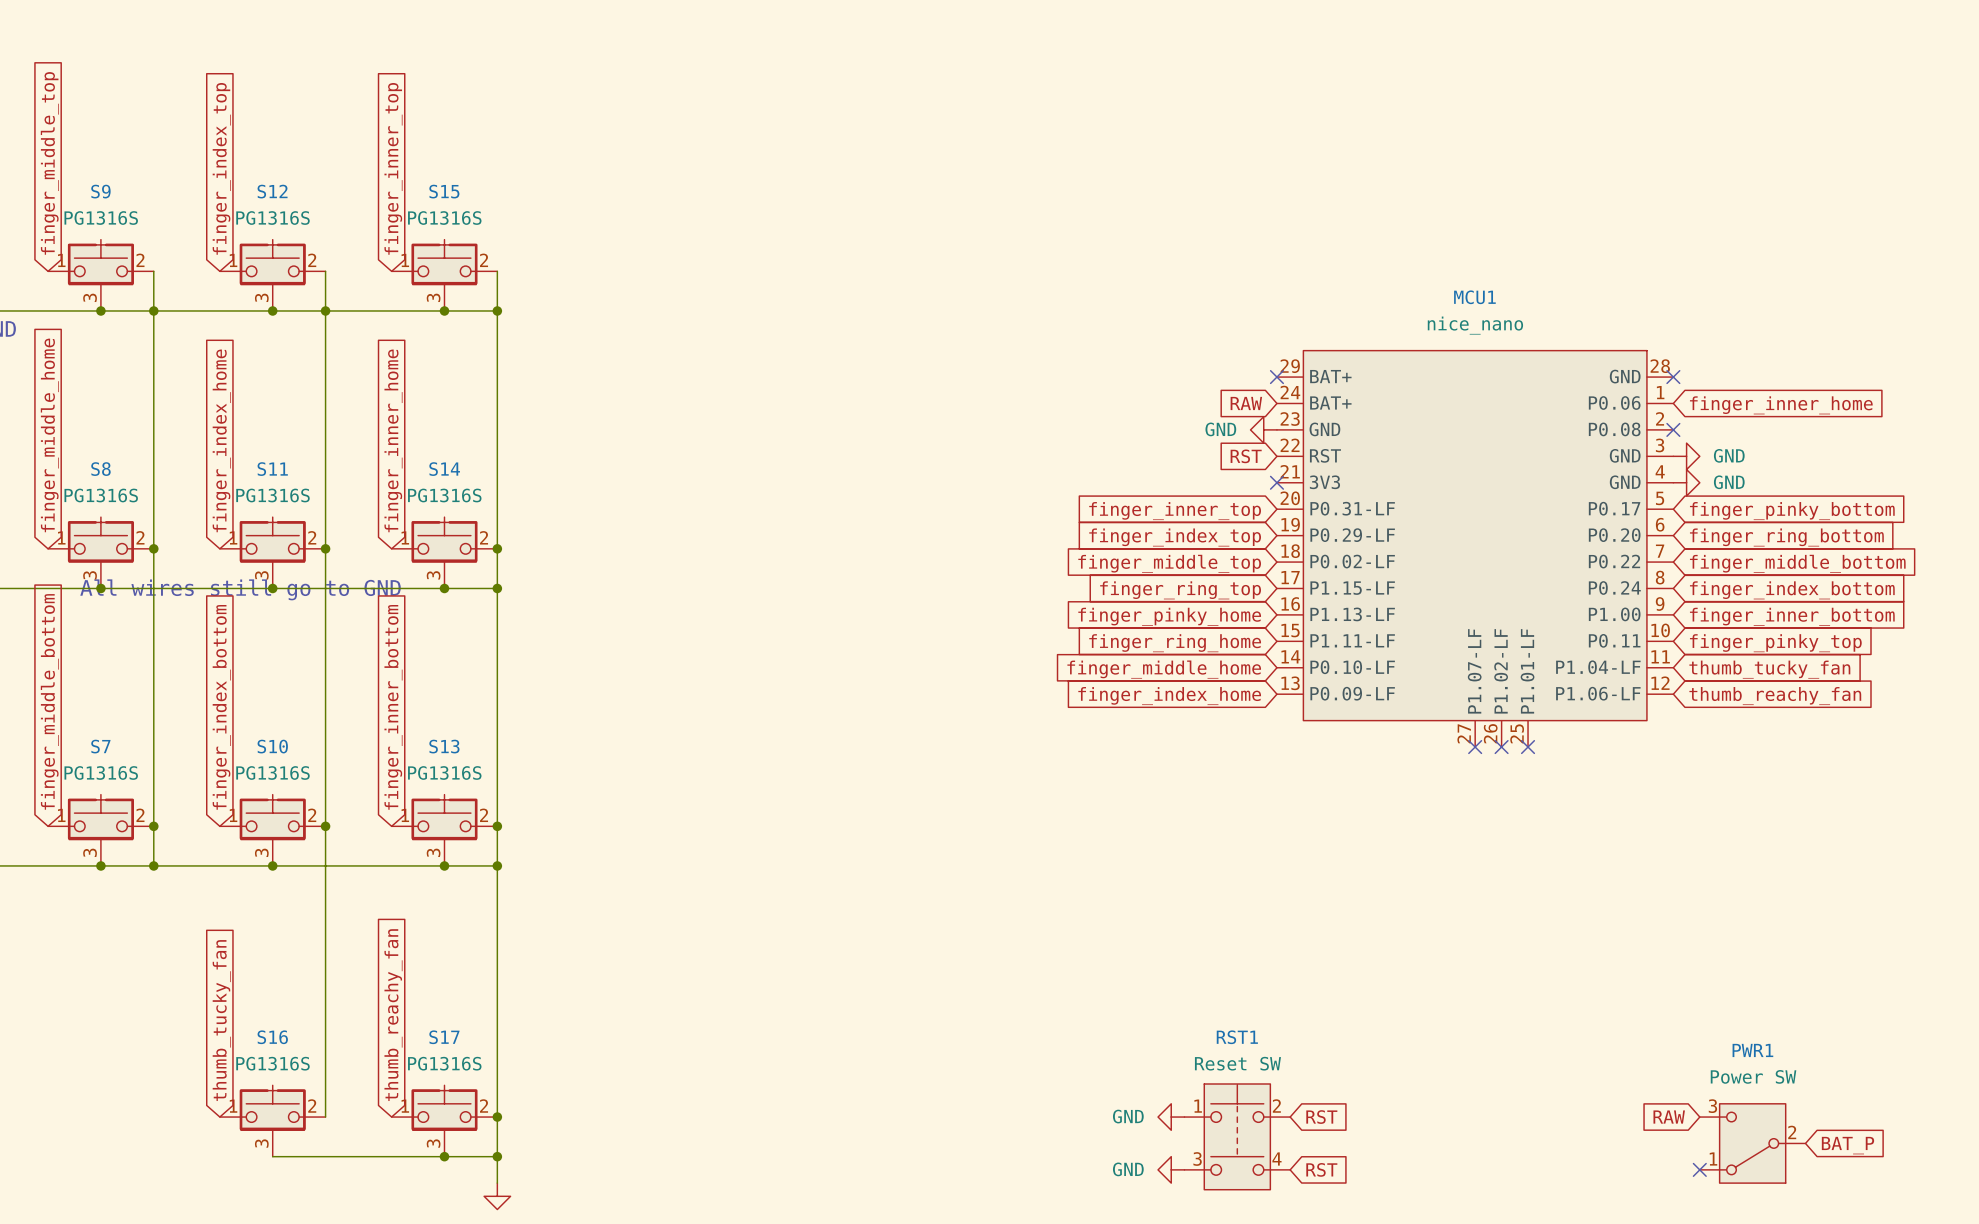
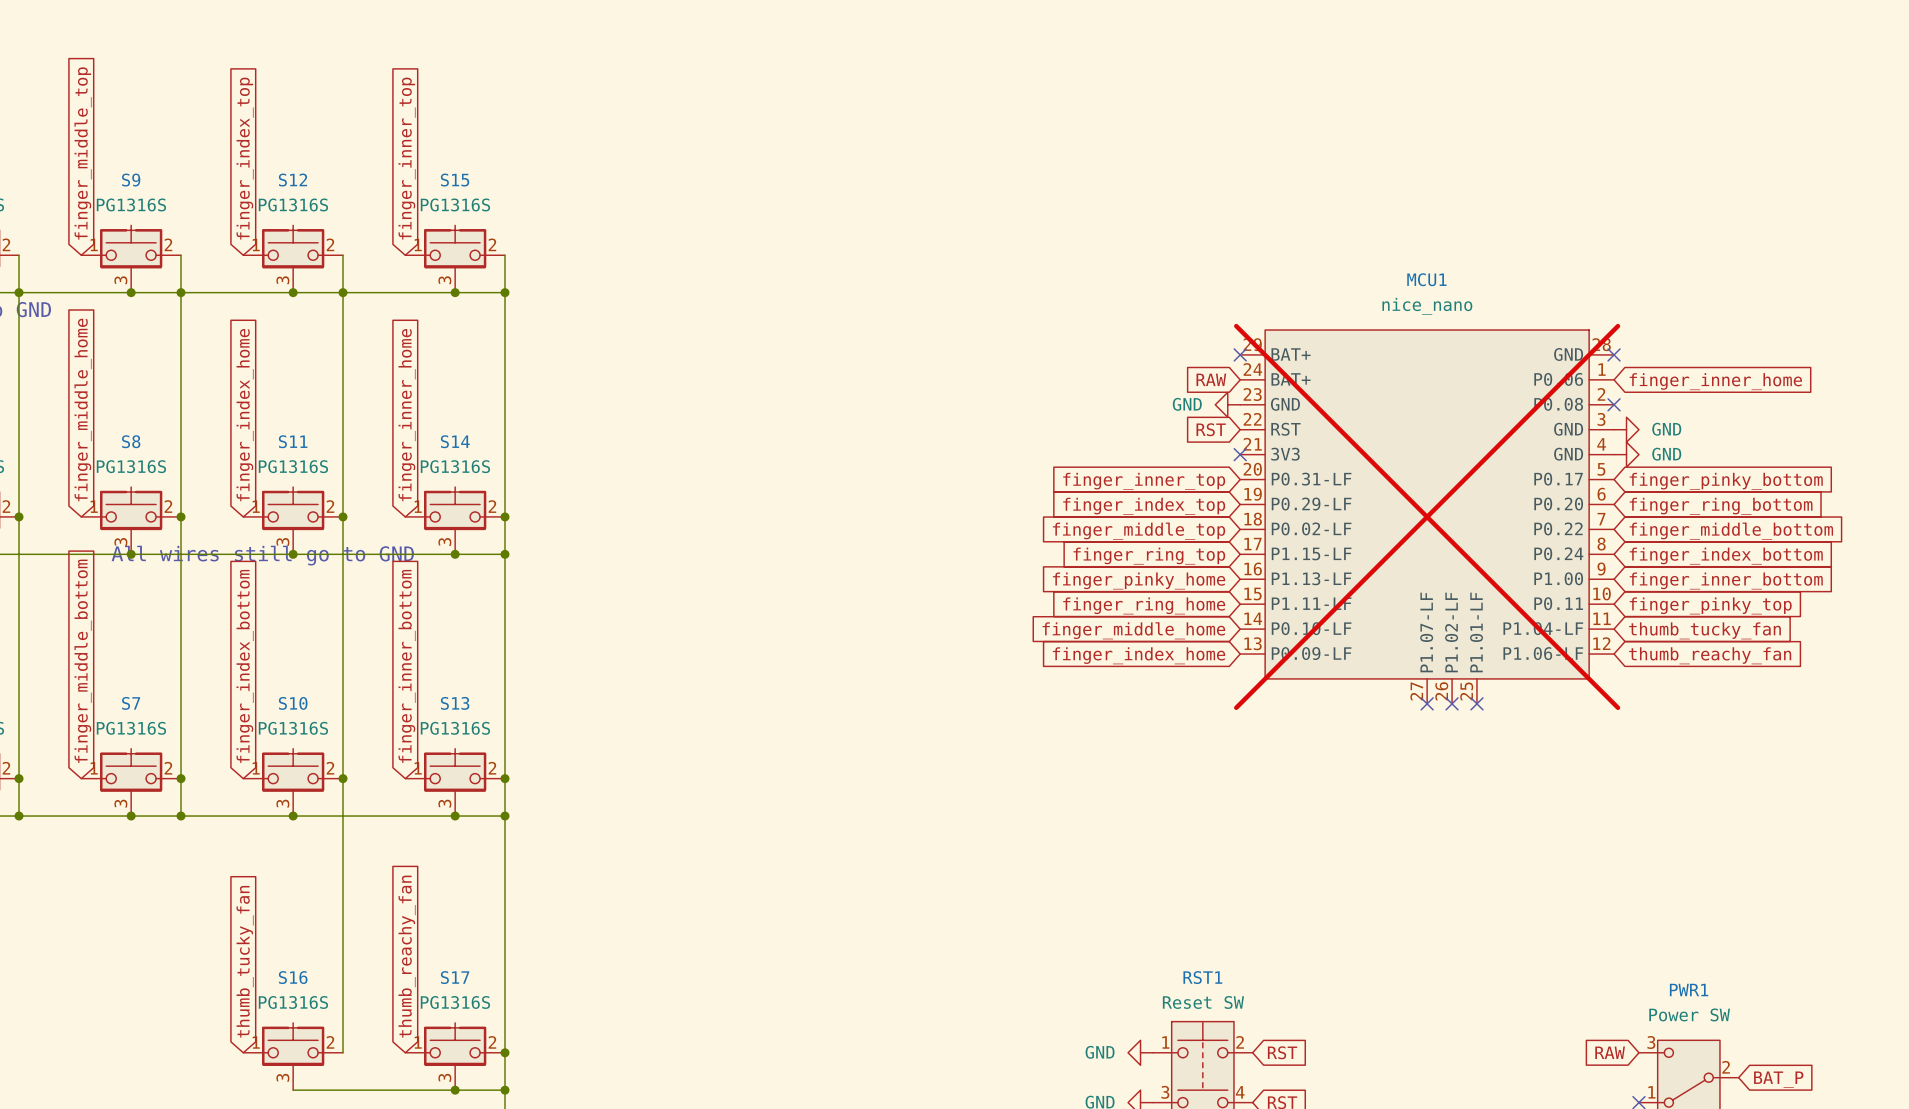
MCU1 do-not-place cross: none -> (1427, 516)

